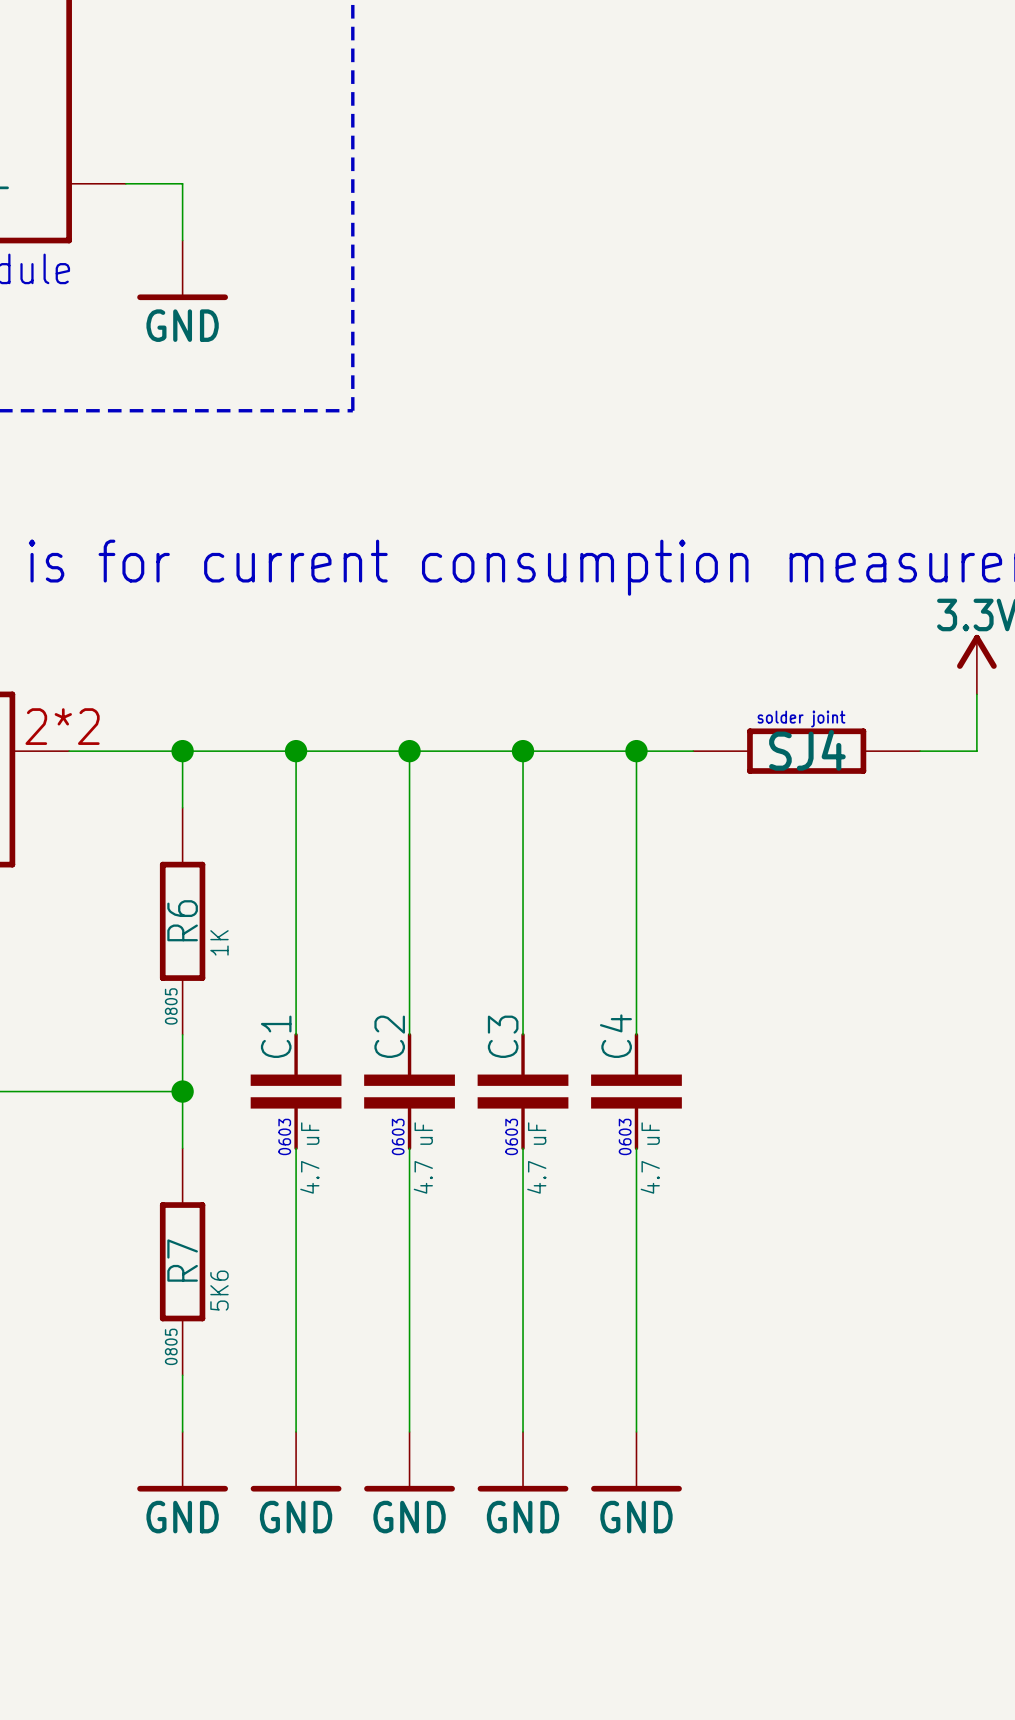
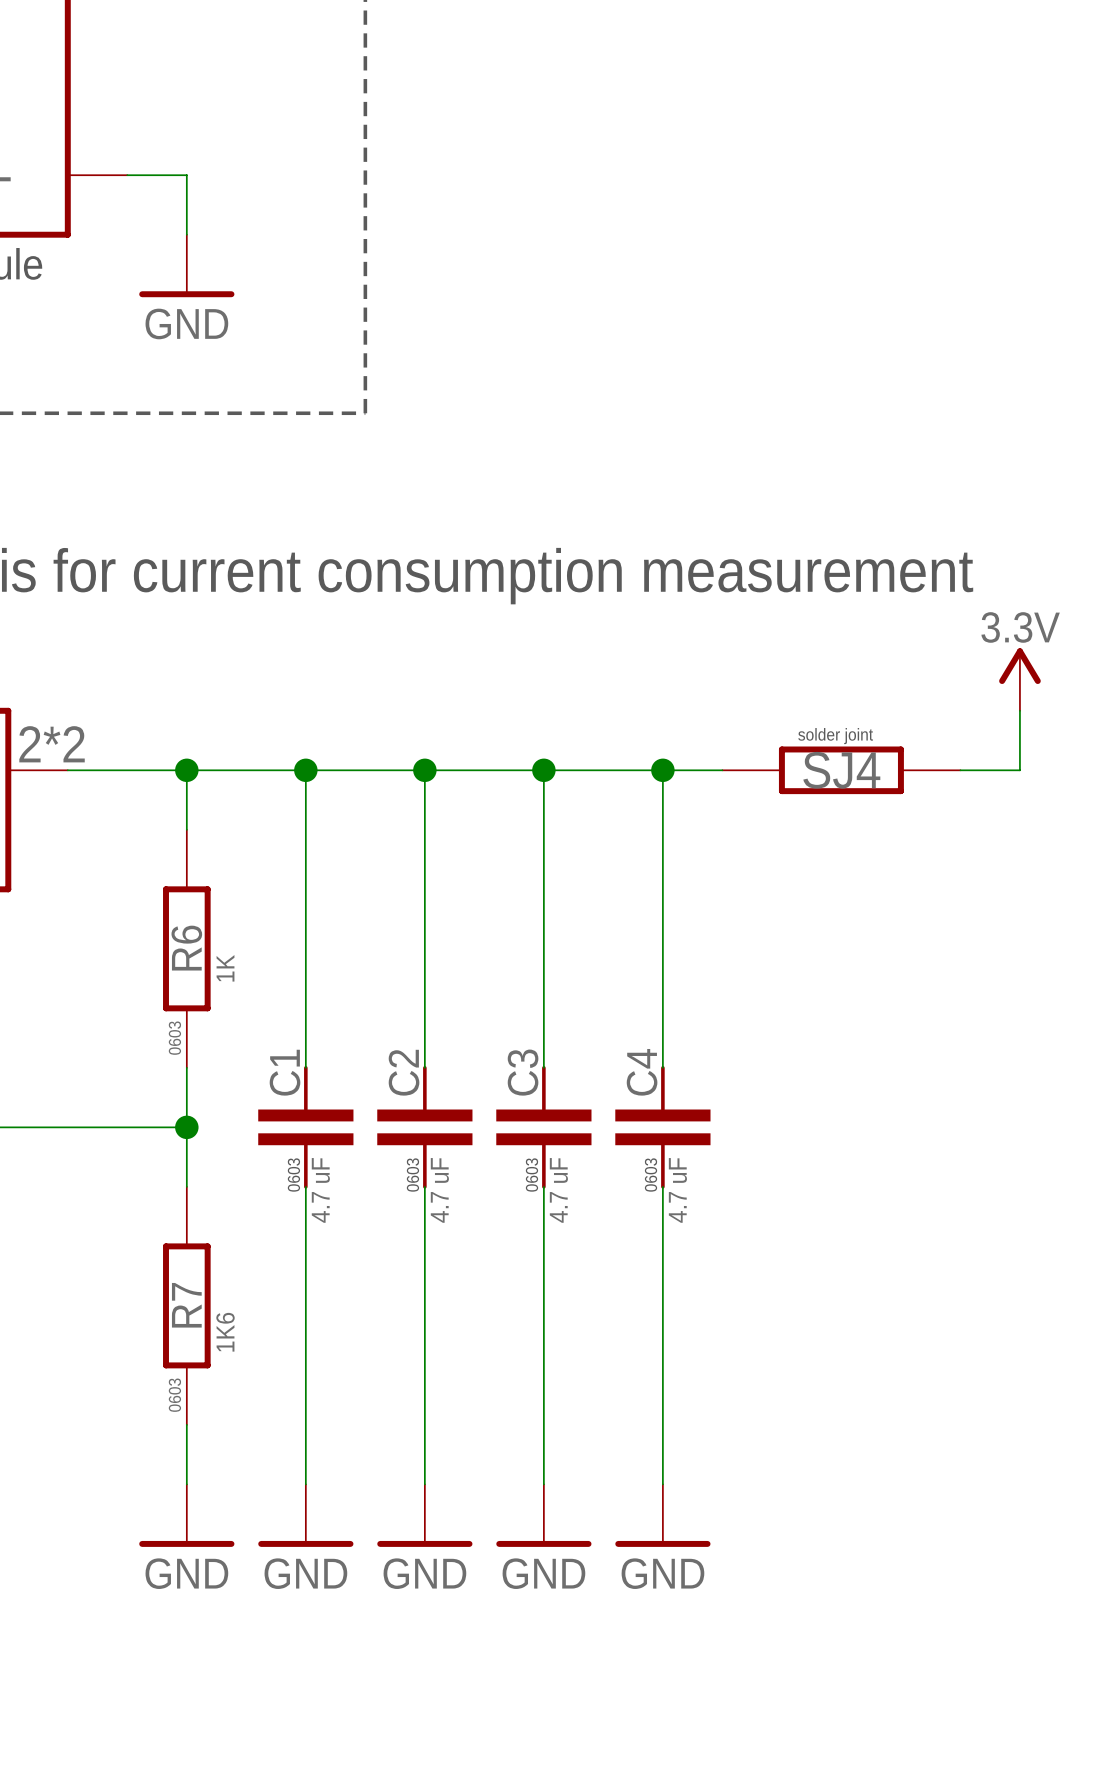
R6 text: 0805 (171, 1006) -> 0603 (174, 1038)
R7 value: 5K6 (219, 1290) -> 1K6 (225, 1332)
R7 text: 0805 (171, 1346) -> 0603 (174, 1395)

